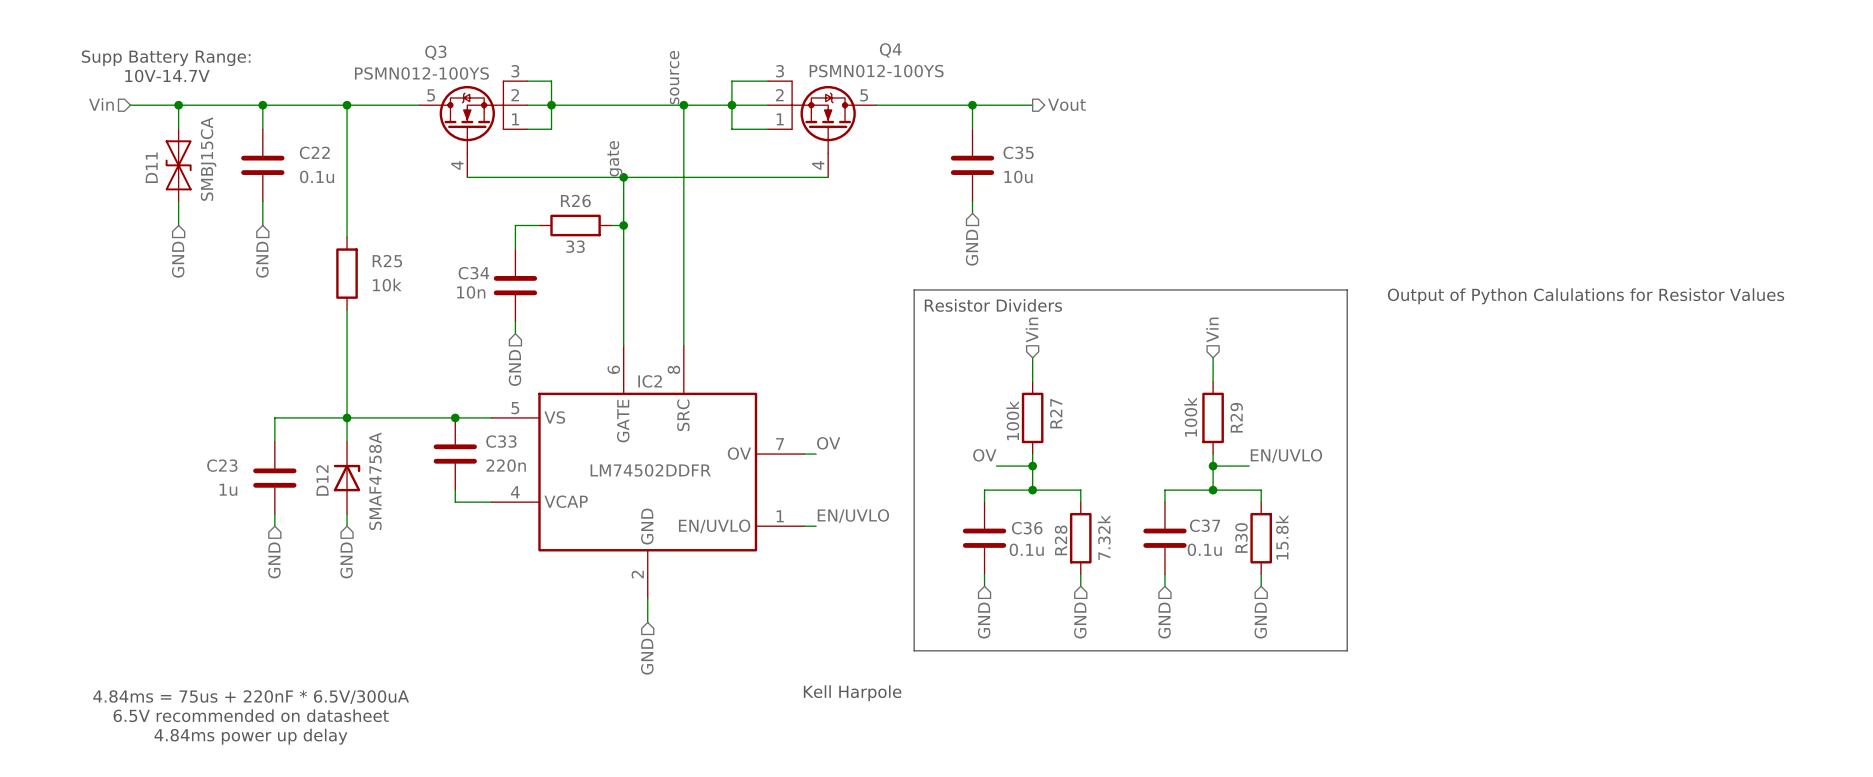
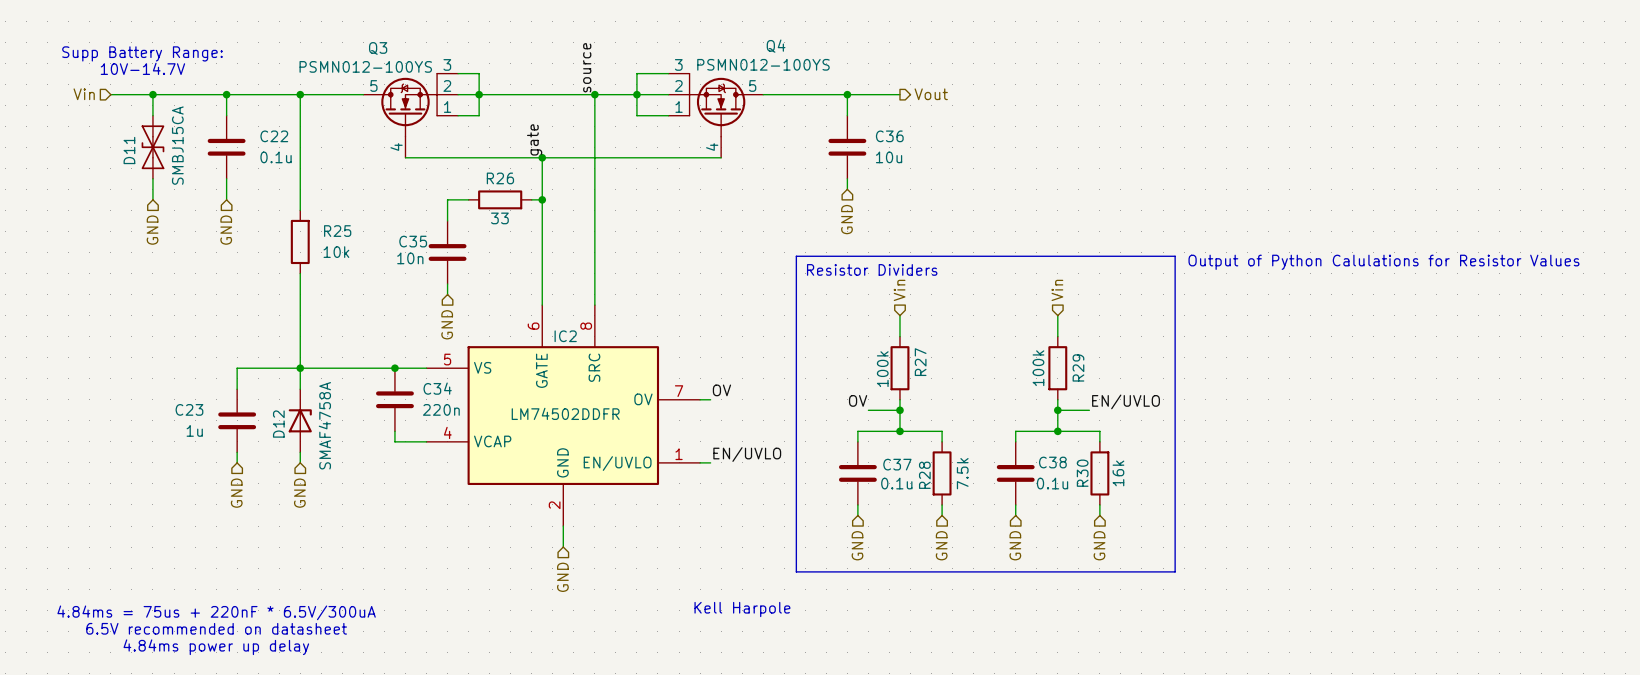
C35 name: C35 (1018, 152) -> C36 (889, 136)
C34 name: C34 (473, 273) -> C35 (413, 241)
C33 name: C33 (501, 441) -> C34 (437, 388)
C37 name: C37 (1205, 525) -> C38 (1052, 462)
C36 name: C36 (1027, 528) -> C37 (897, 464)
R28 value: 7.32k (1104, 537) -> 7.5k (962, 473)
R30 value: 15.8k (1282, 537) -> 16k (1118, 473)

